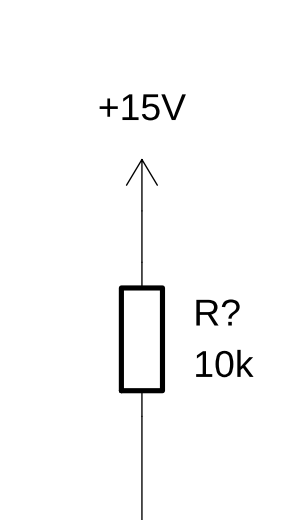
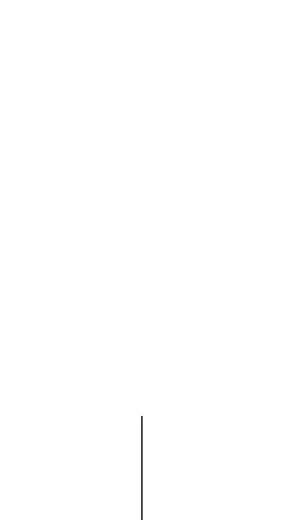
power symbol: +15V (141, 185) -> none
wire: (141, 210) (141, 262) -> none
R?: 10k (141, 339) -> none

